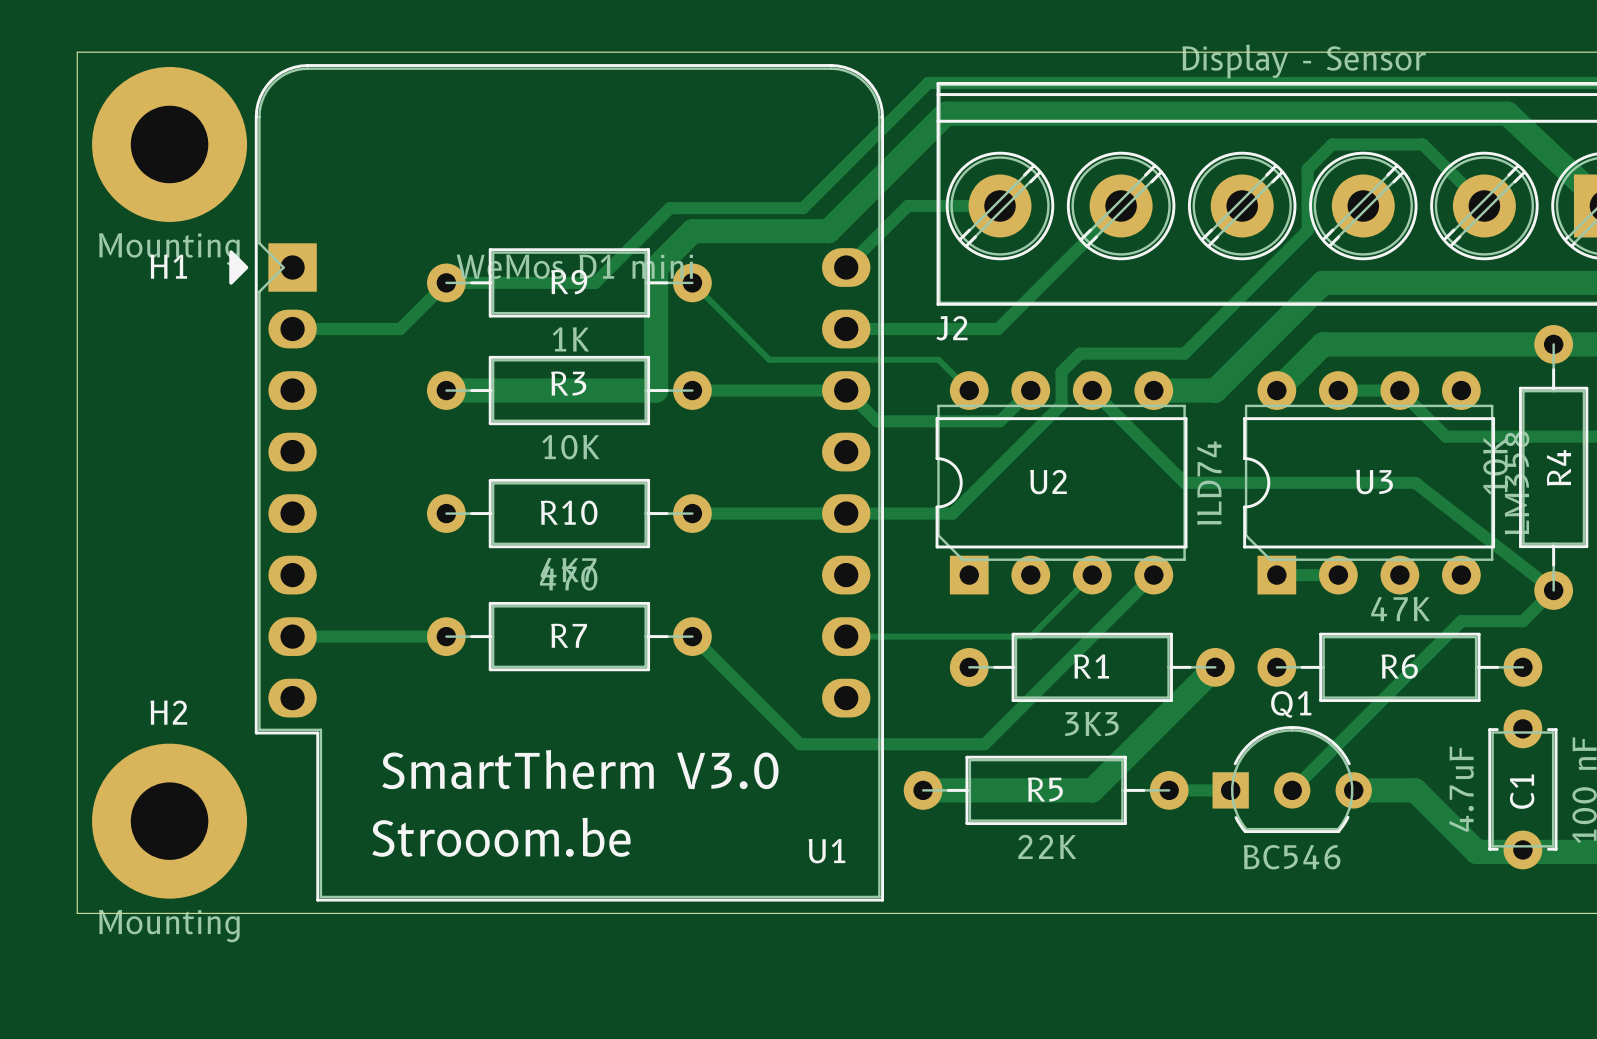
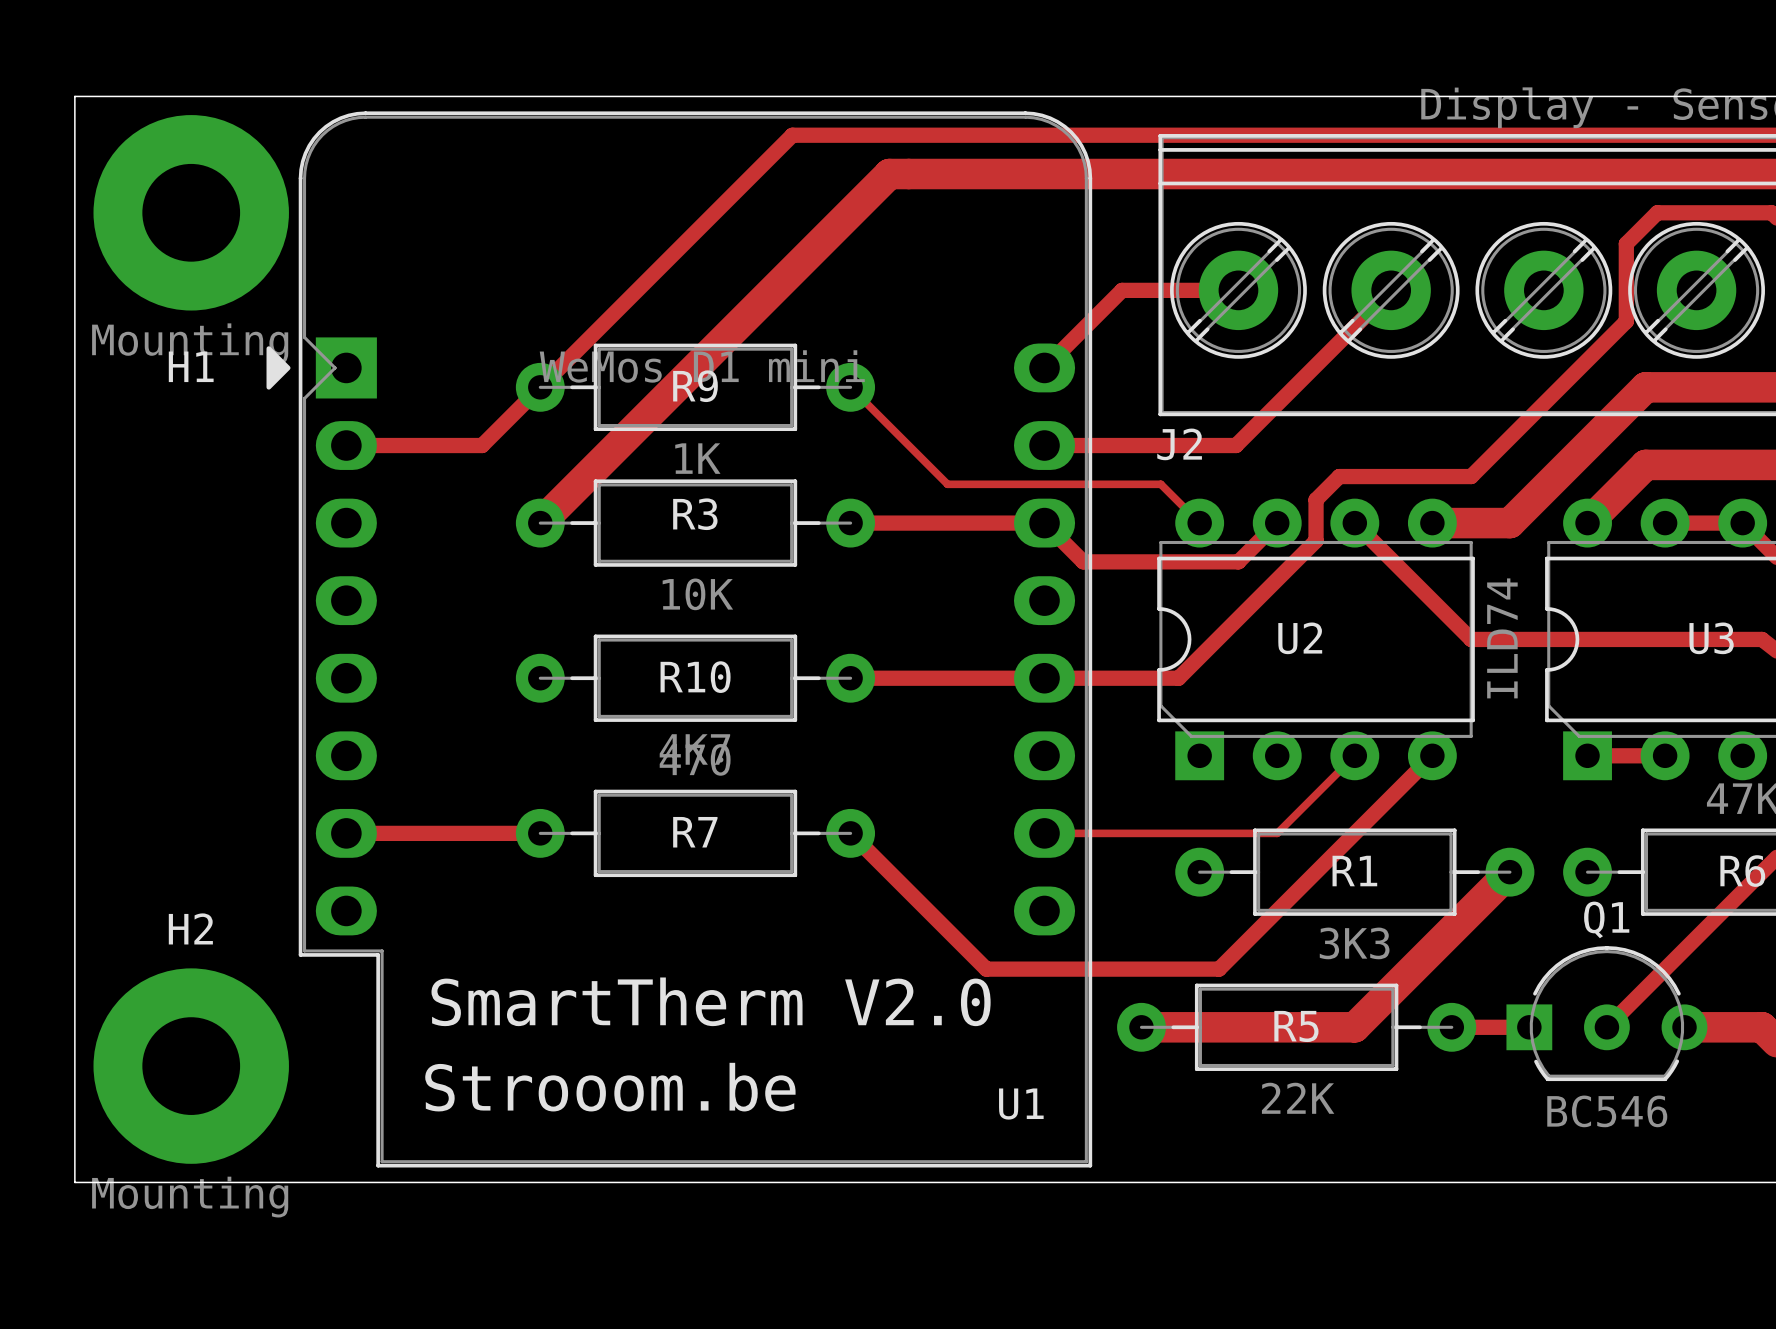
track: (928, 82) (803, 208) (669, 208) (595, 282) (446, 282) -> (1148, 135) (792, 135) (540, 387)
track: (946, 113) (828, 231) (692, 231) (656, 267) (656, 390) (446, 390) -> (1170, 174) (889, 174) (540, 523)
text: SmartTherm V3.0 (580, 769) -> SmartTherm V2.0 (711, 1001)

